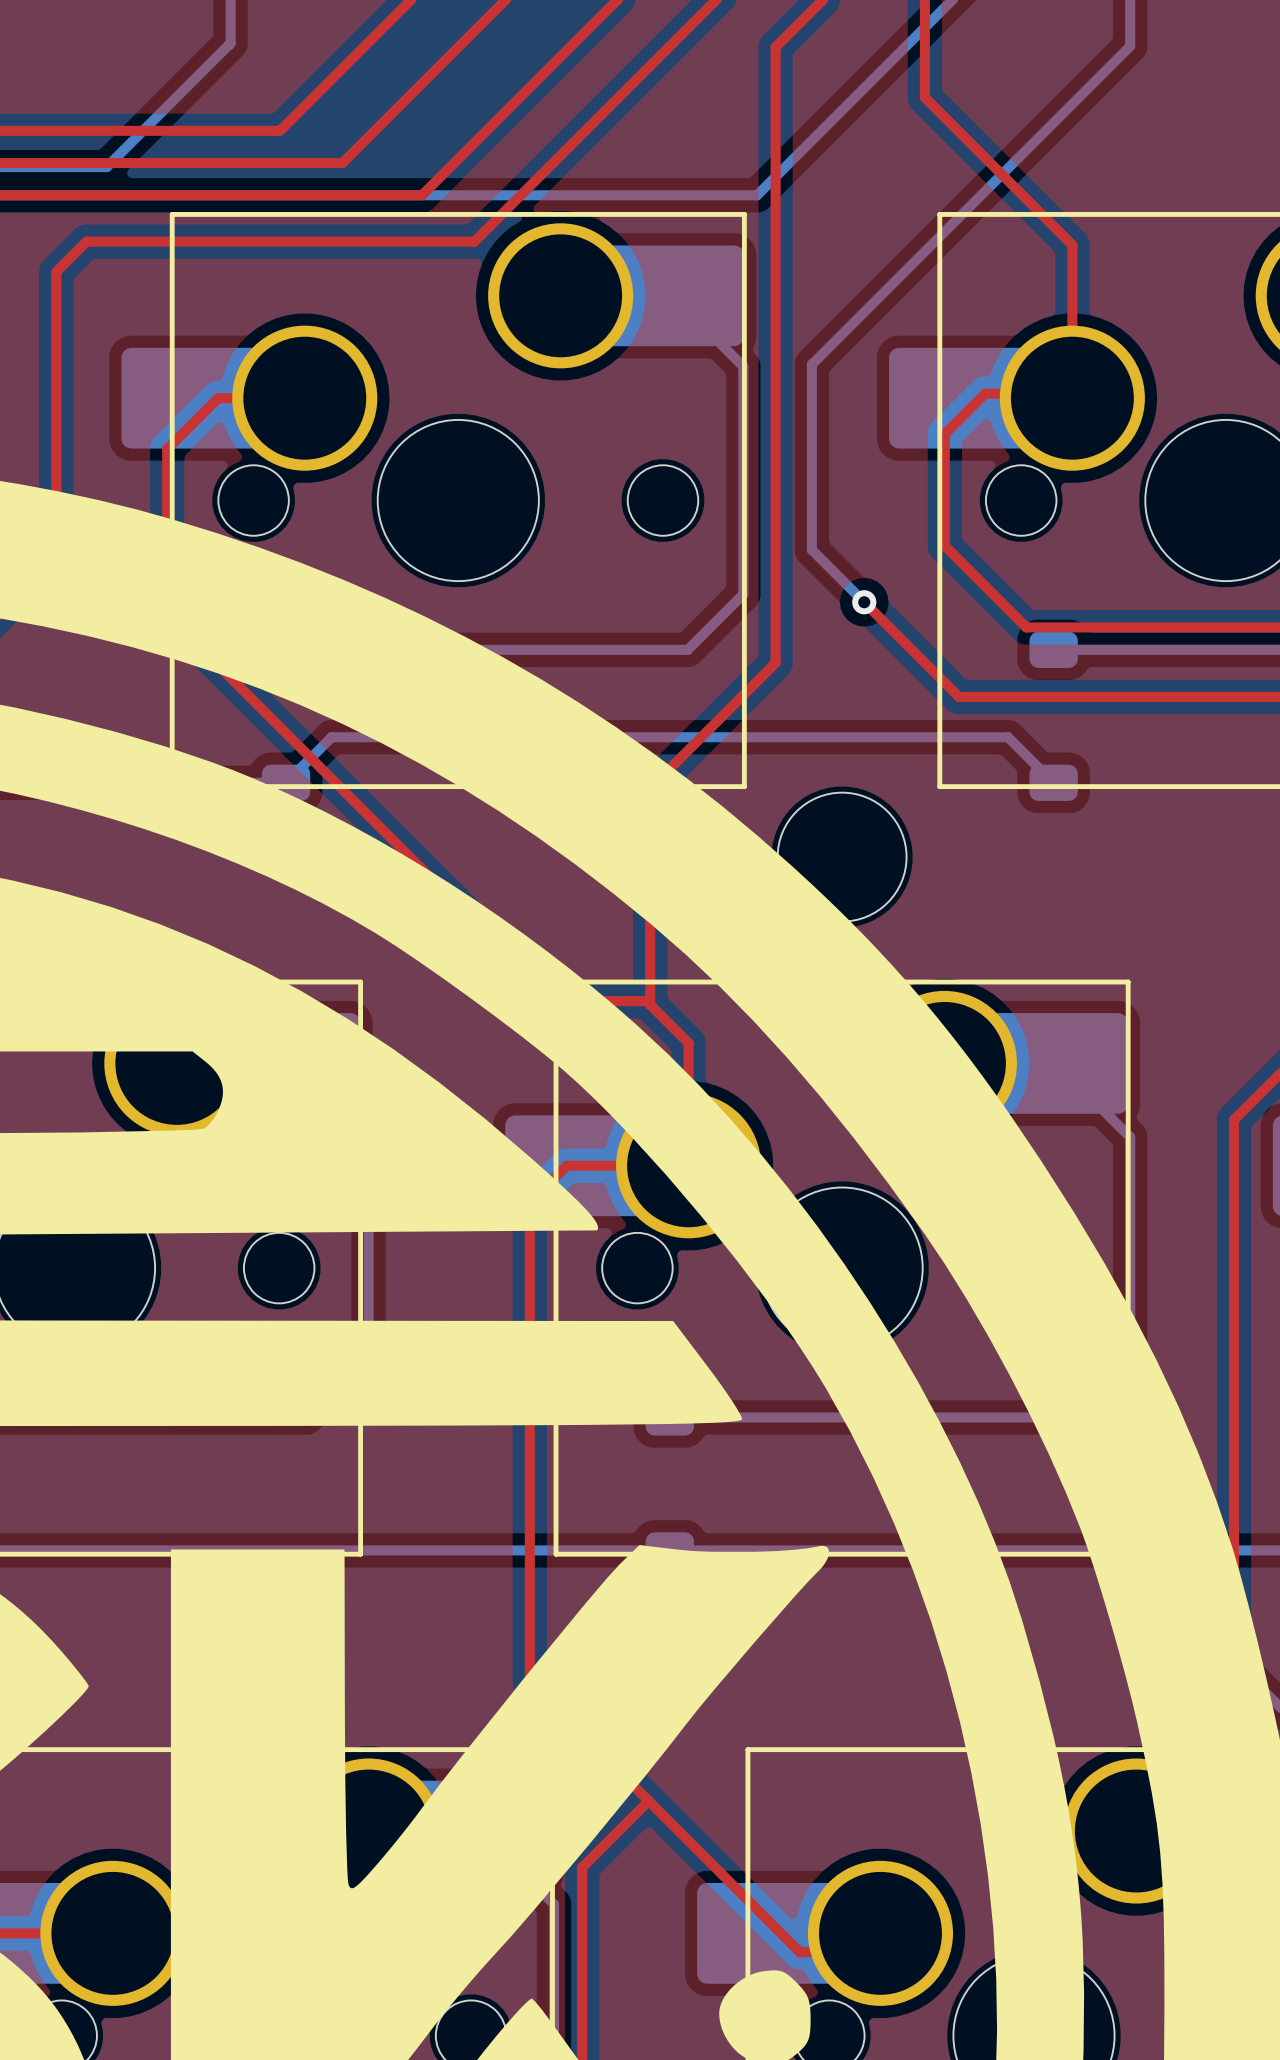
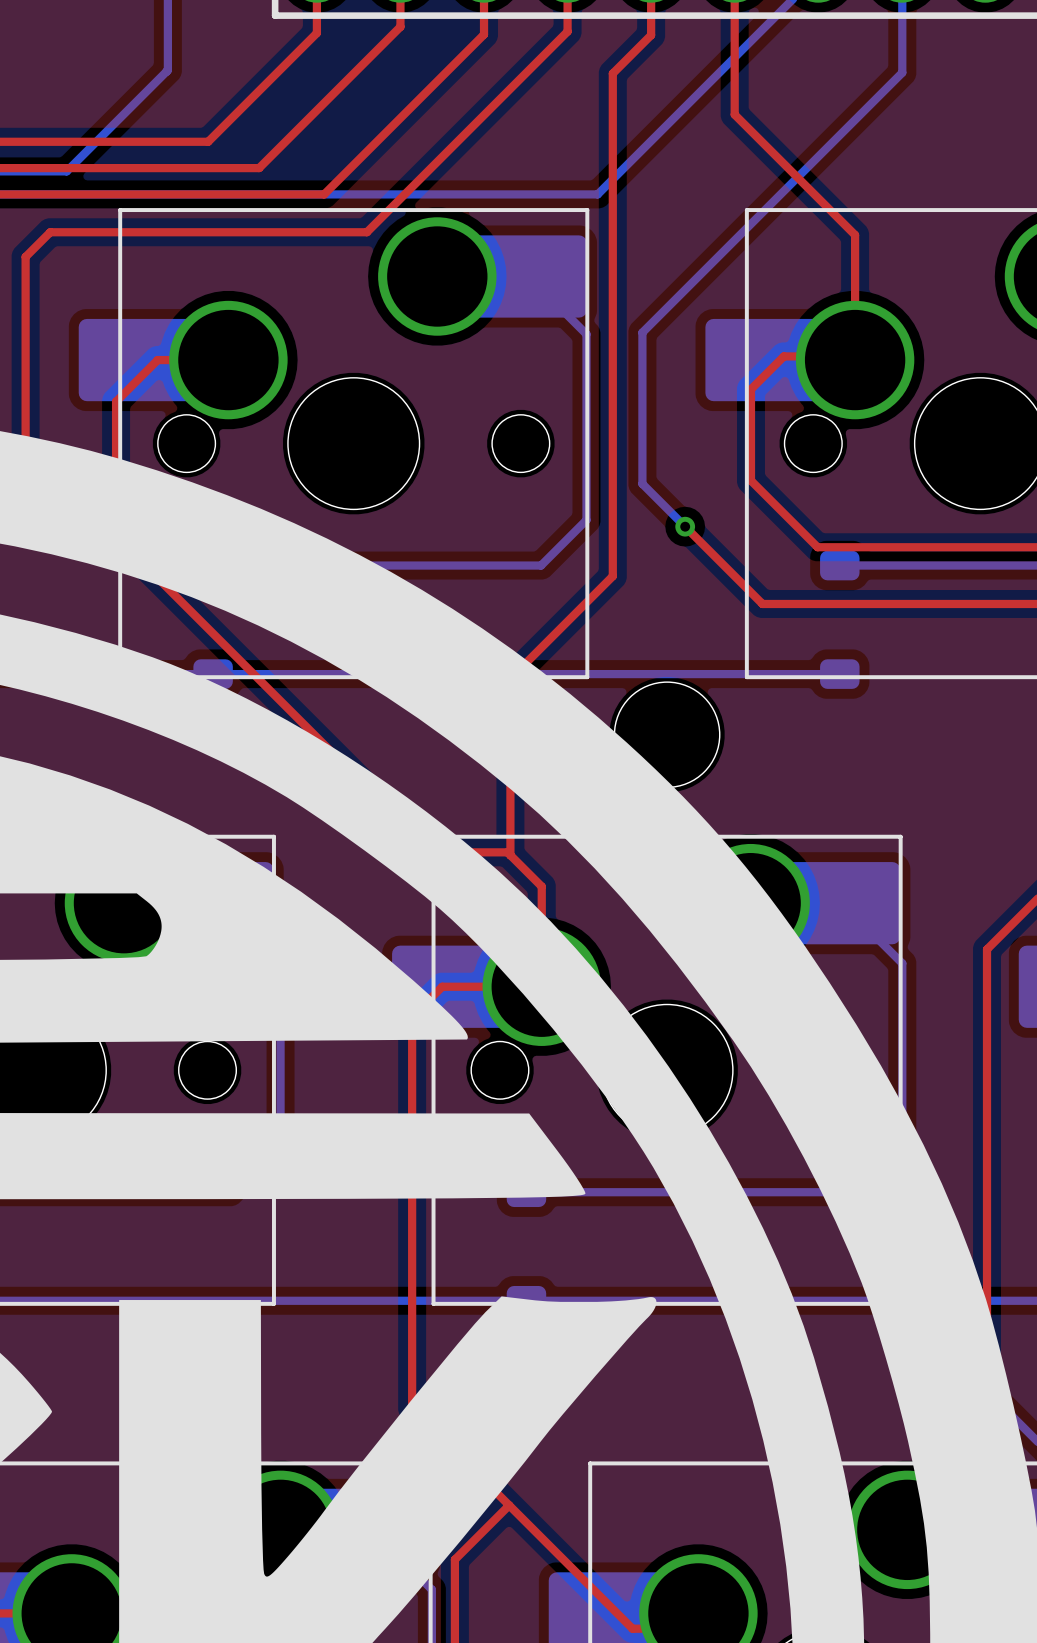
bottom track: (286, 782) (331, 737) (1008, 737) (1053, 782) -> (213, 674) (839, 674)

